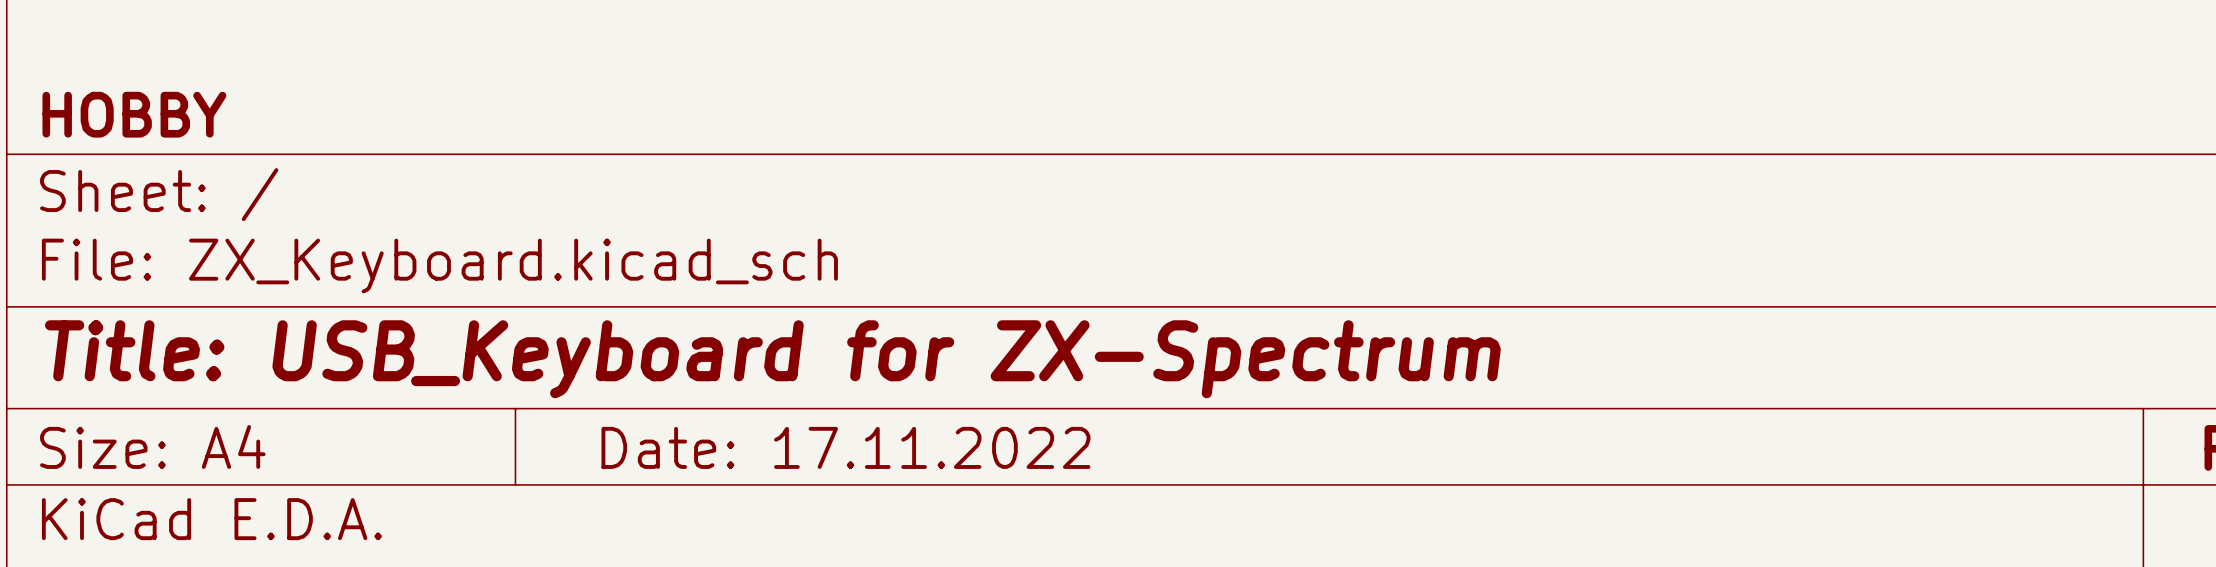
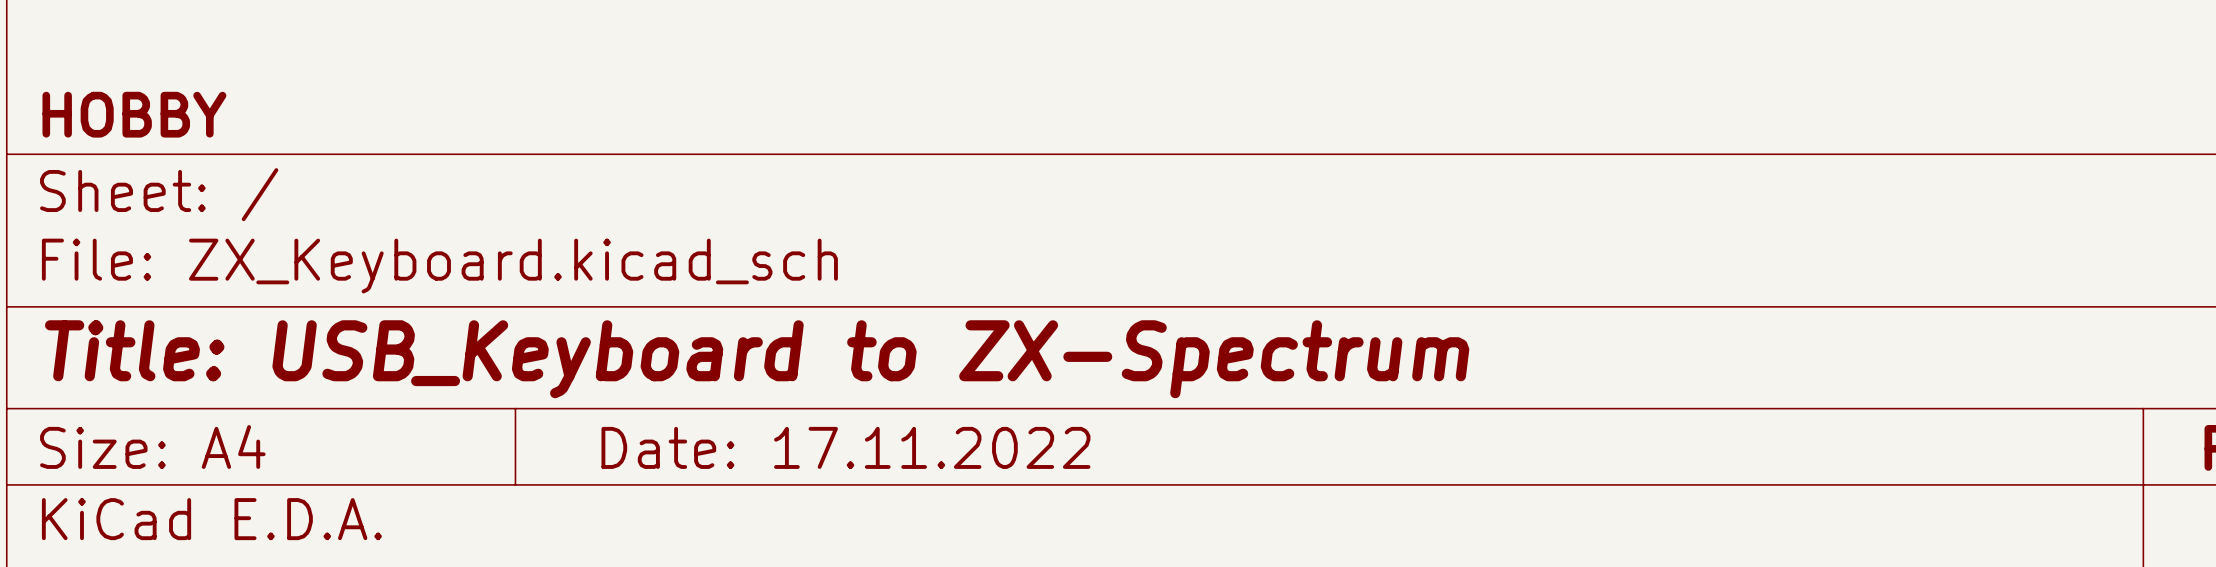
title block: Title: USB_Keyboard for ZX-Spectrum (772, 359) -> Title: USB_Keyboard to ZX-Spectrum (757, 359)

